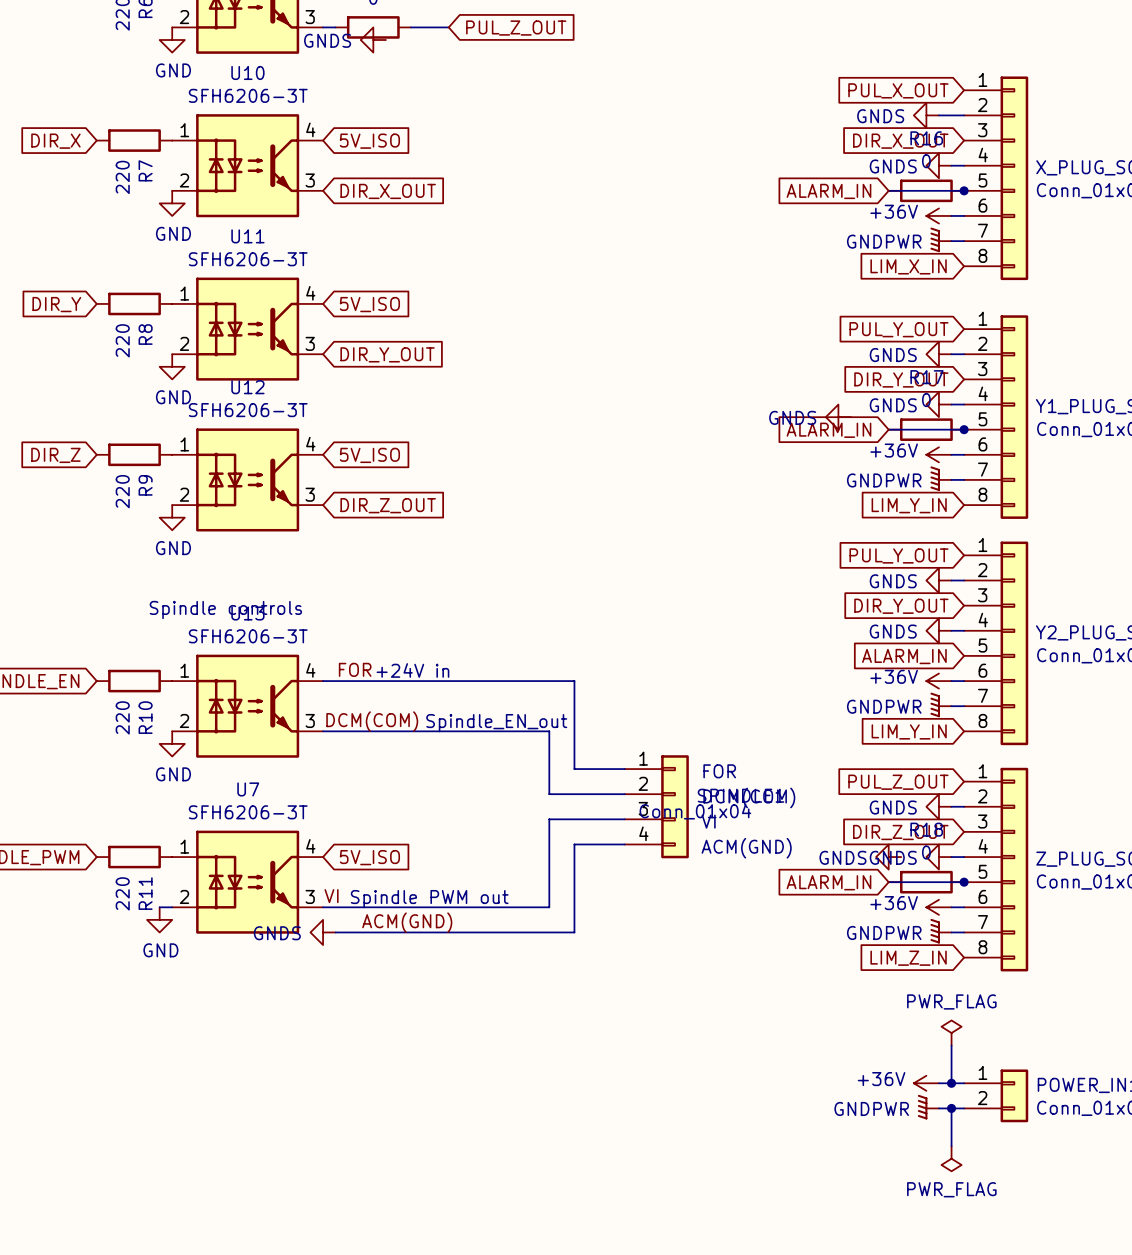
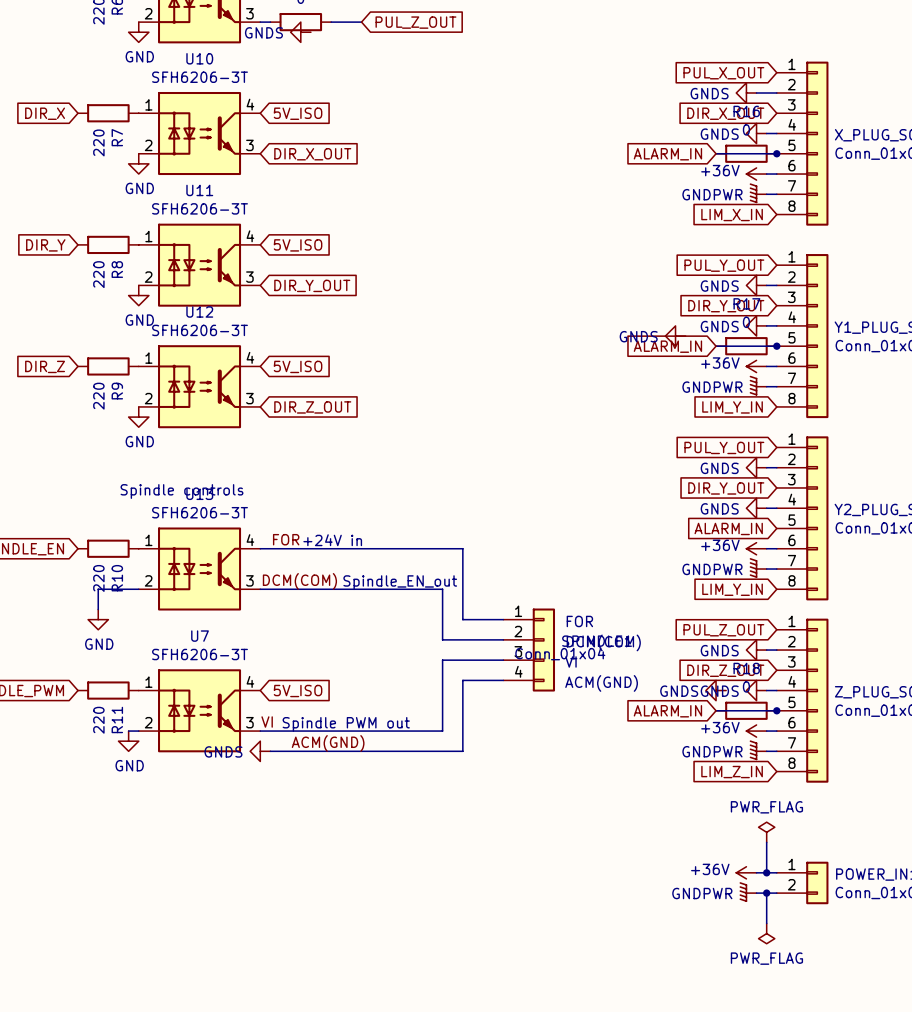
wire: none -> (138, 589) (98, 589) (98, 609)
power symbol position: GND (172, 743) -> GND (98, 619)

